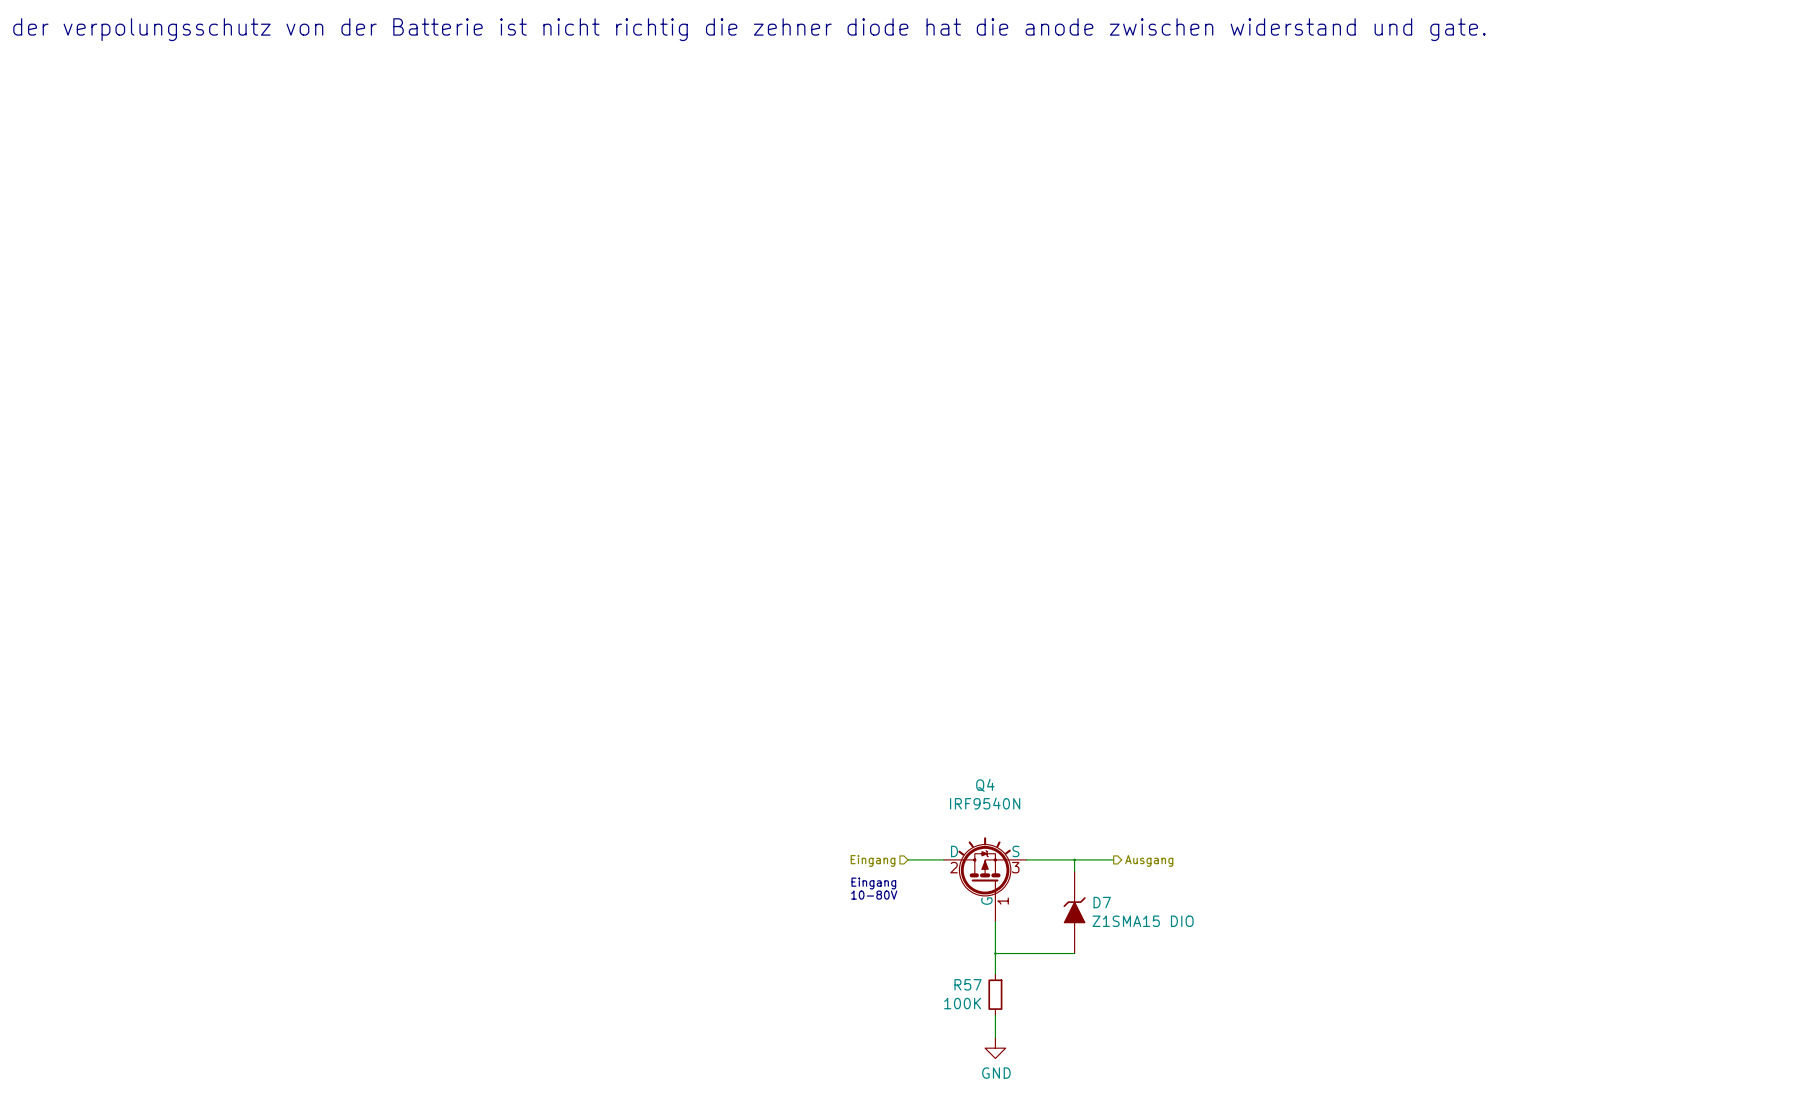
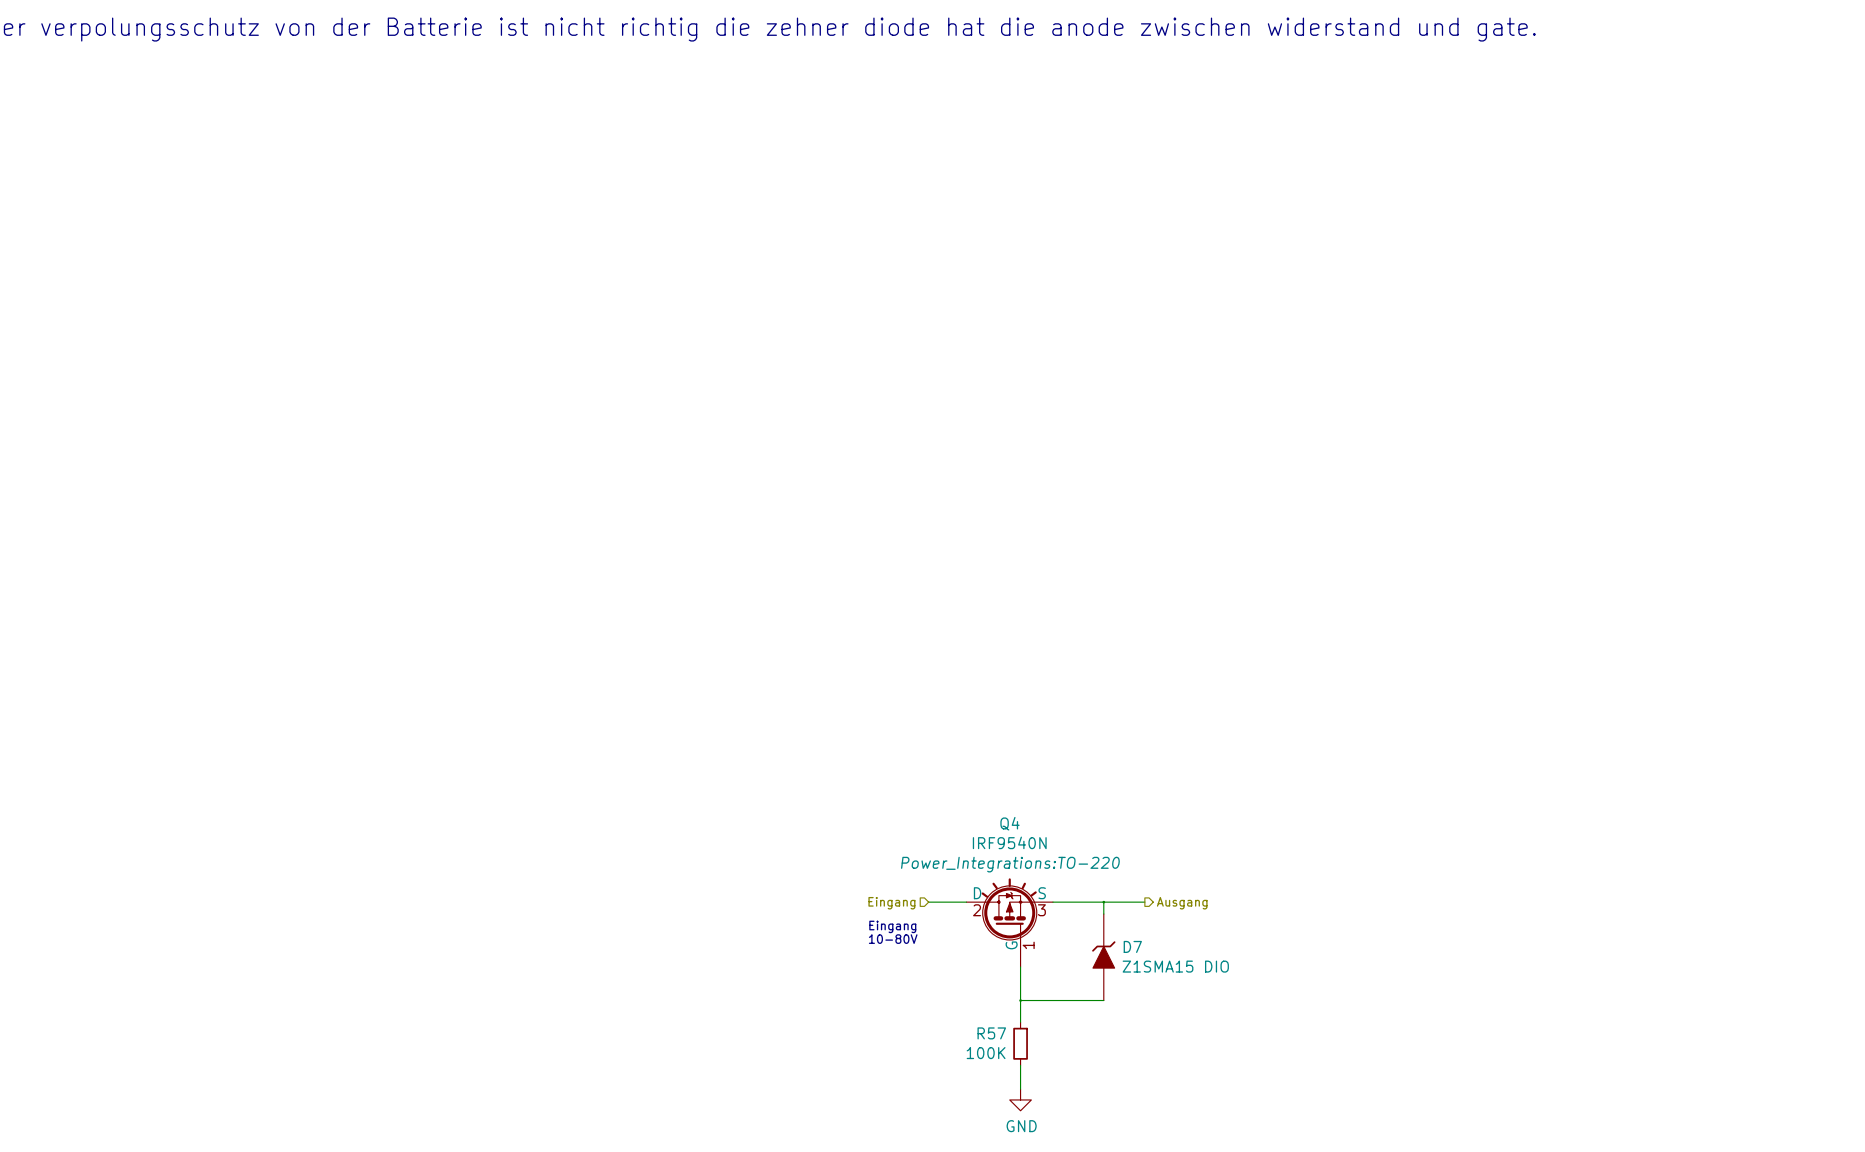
Q4 text: none -> Power_Integrations:TO-220 (1010, 864)

